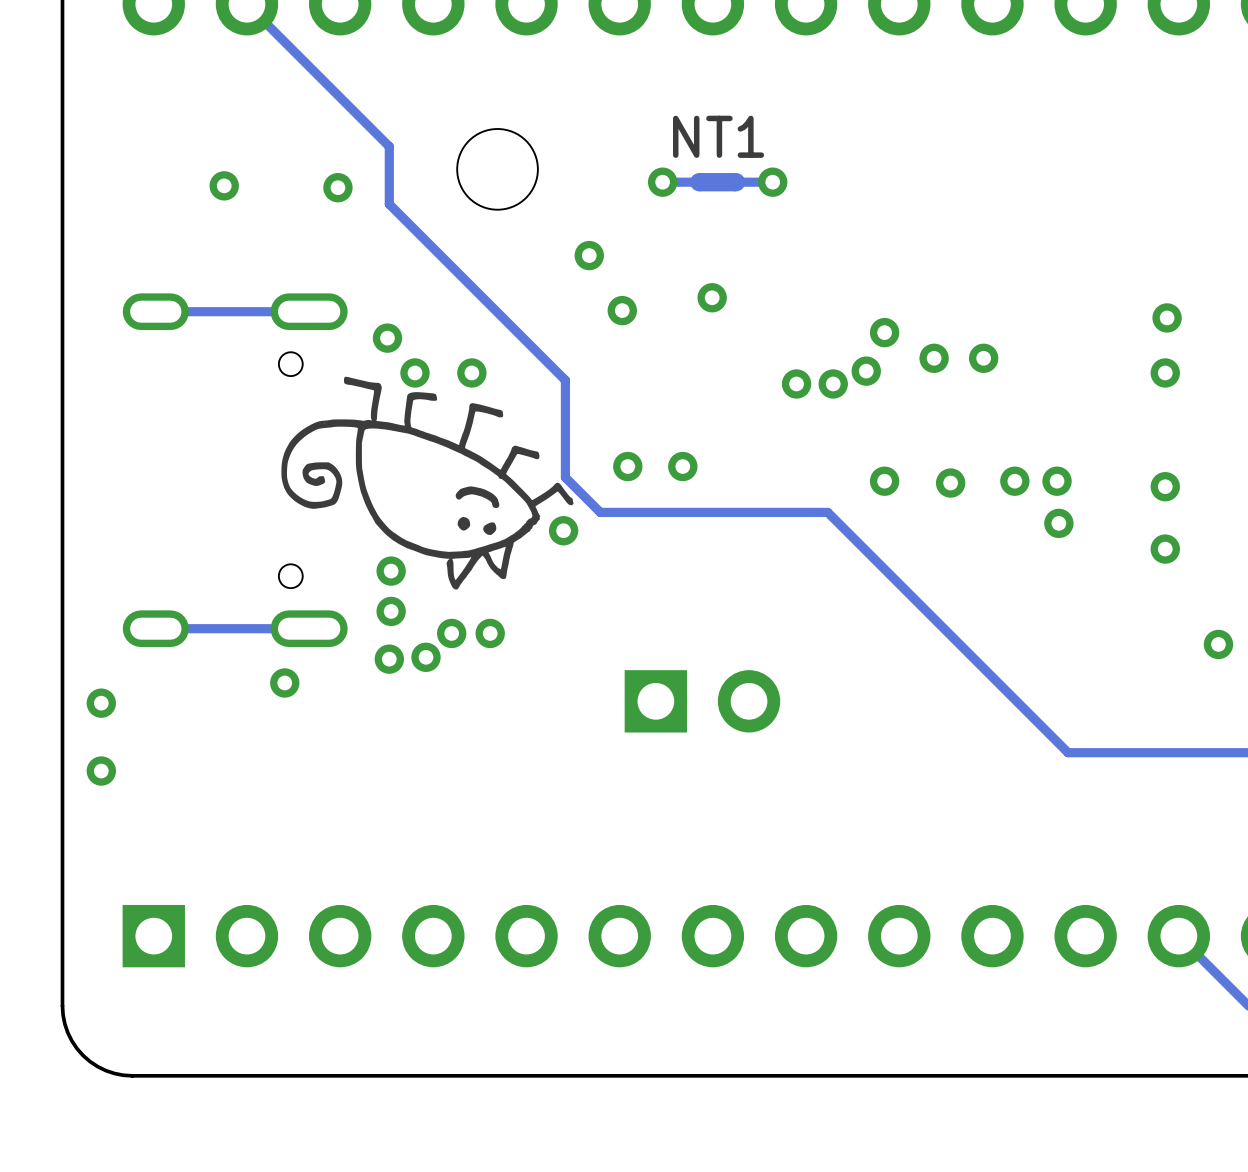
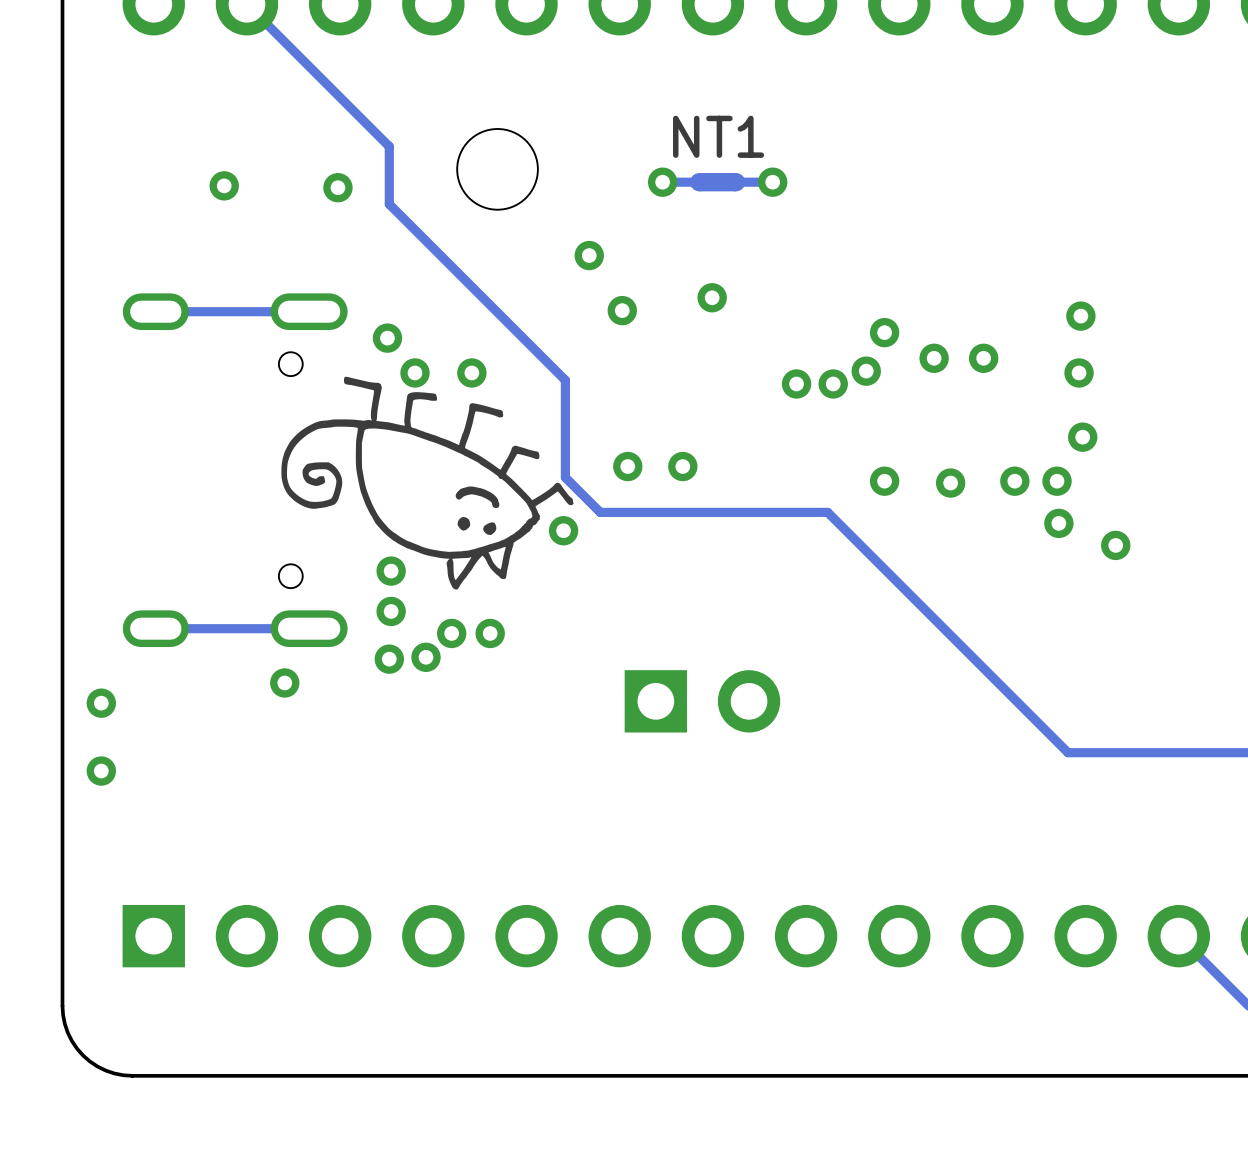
via: none -> (1080, 316)
via: (1167, 317) -> none
via: none -> (1079, 372)
via: (1165, 372) -> none
via: none -> (1082, 437)
via: (1165, 486) -> none
via: none -> (1115, 545)
via: (1165, 549) -> none
via: (1218, 644) -> none

